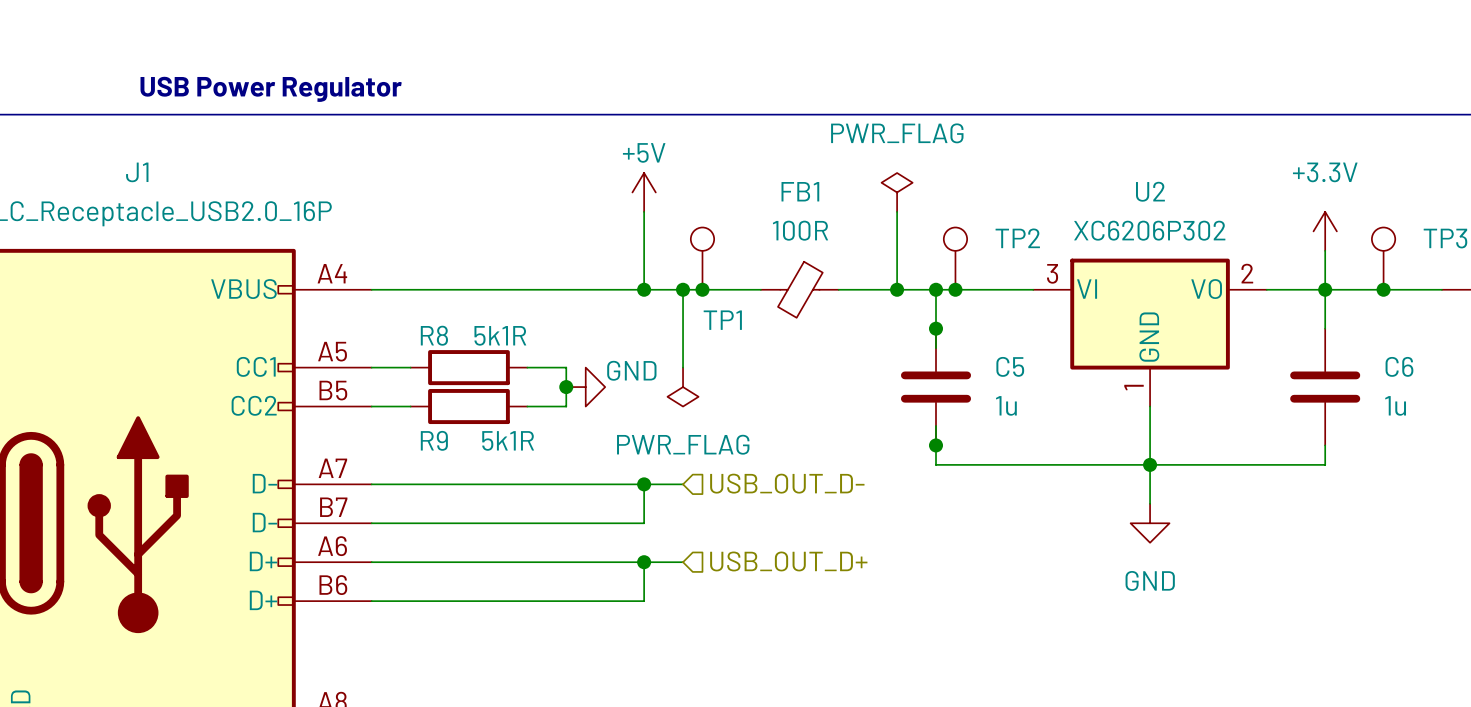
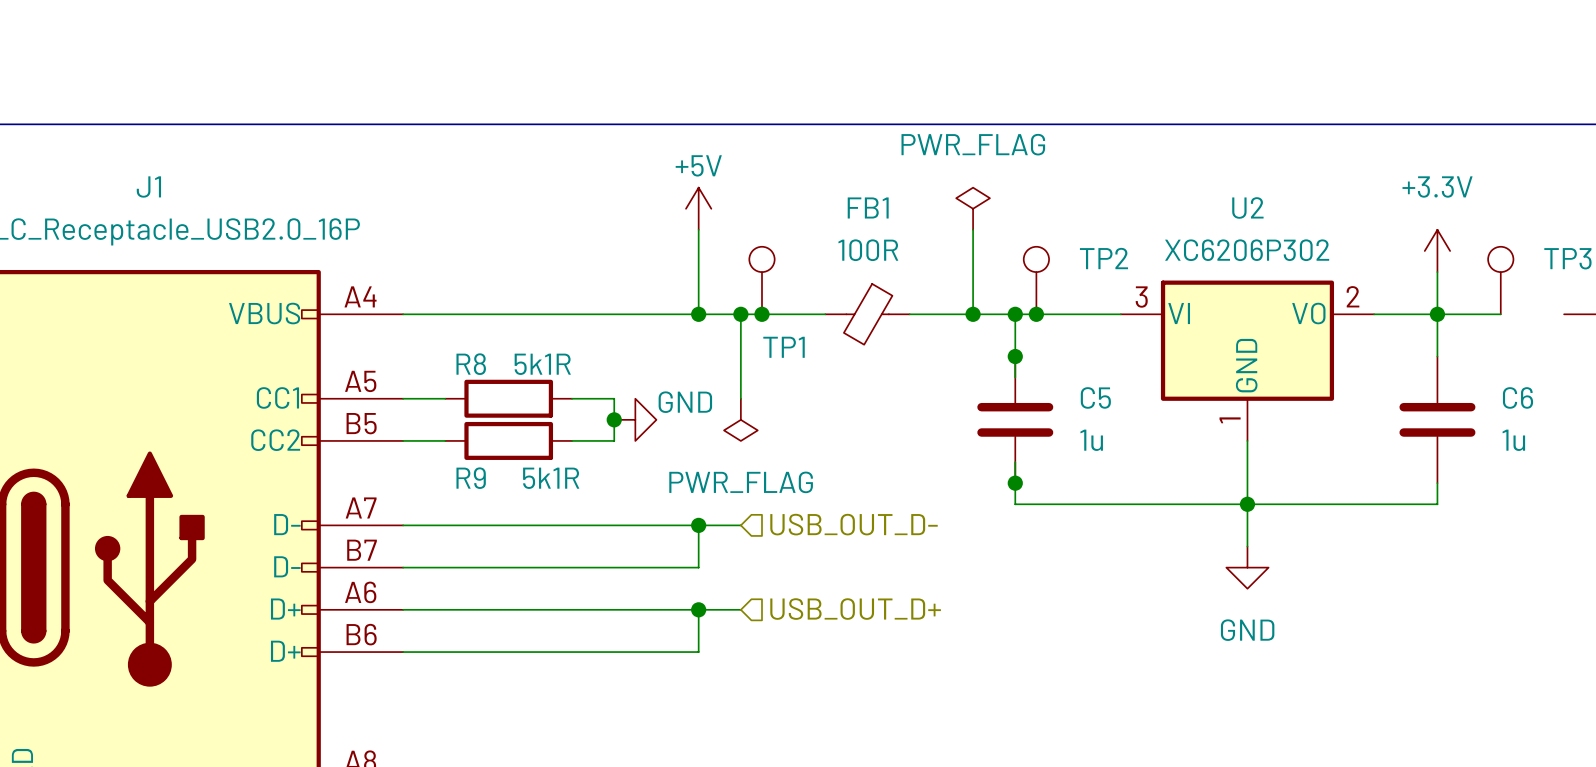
text: USB Power Regulator (271, 89) -> none
wire: (1383, 289) (1441, 289) -> none
junction: (1383, 289) -> none

